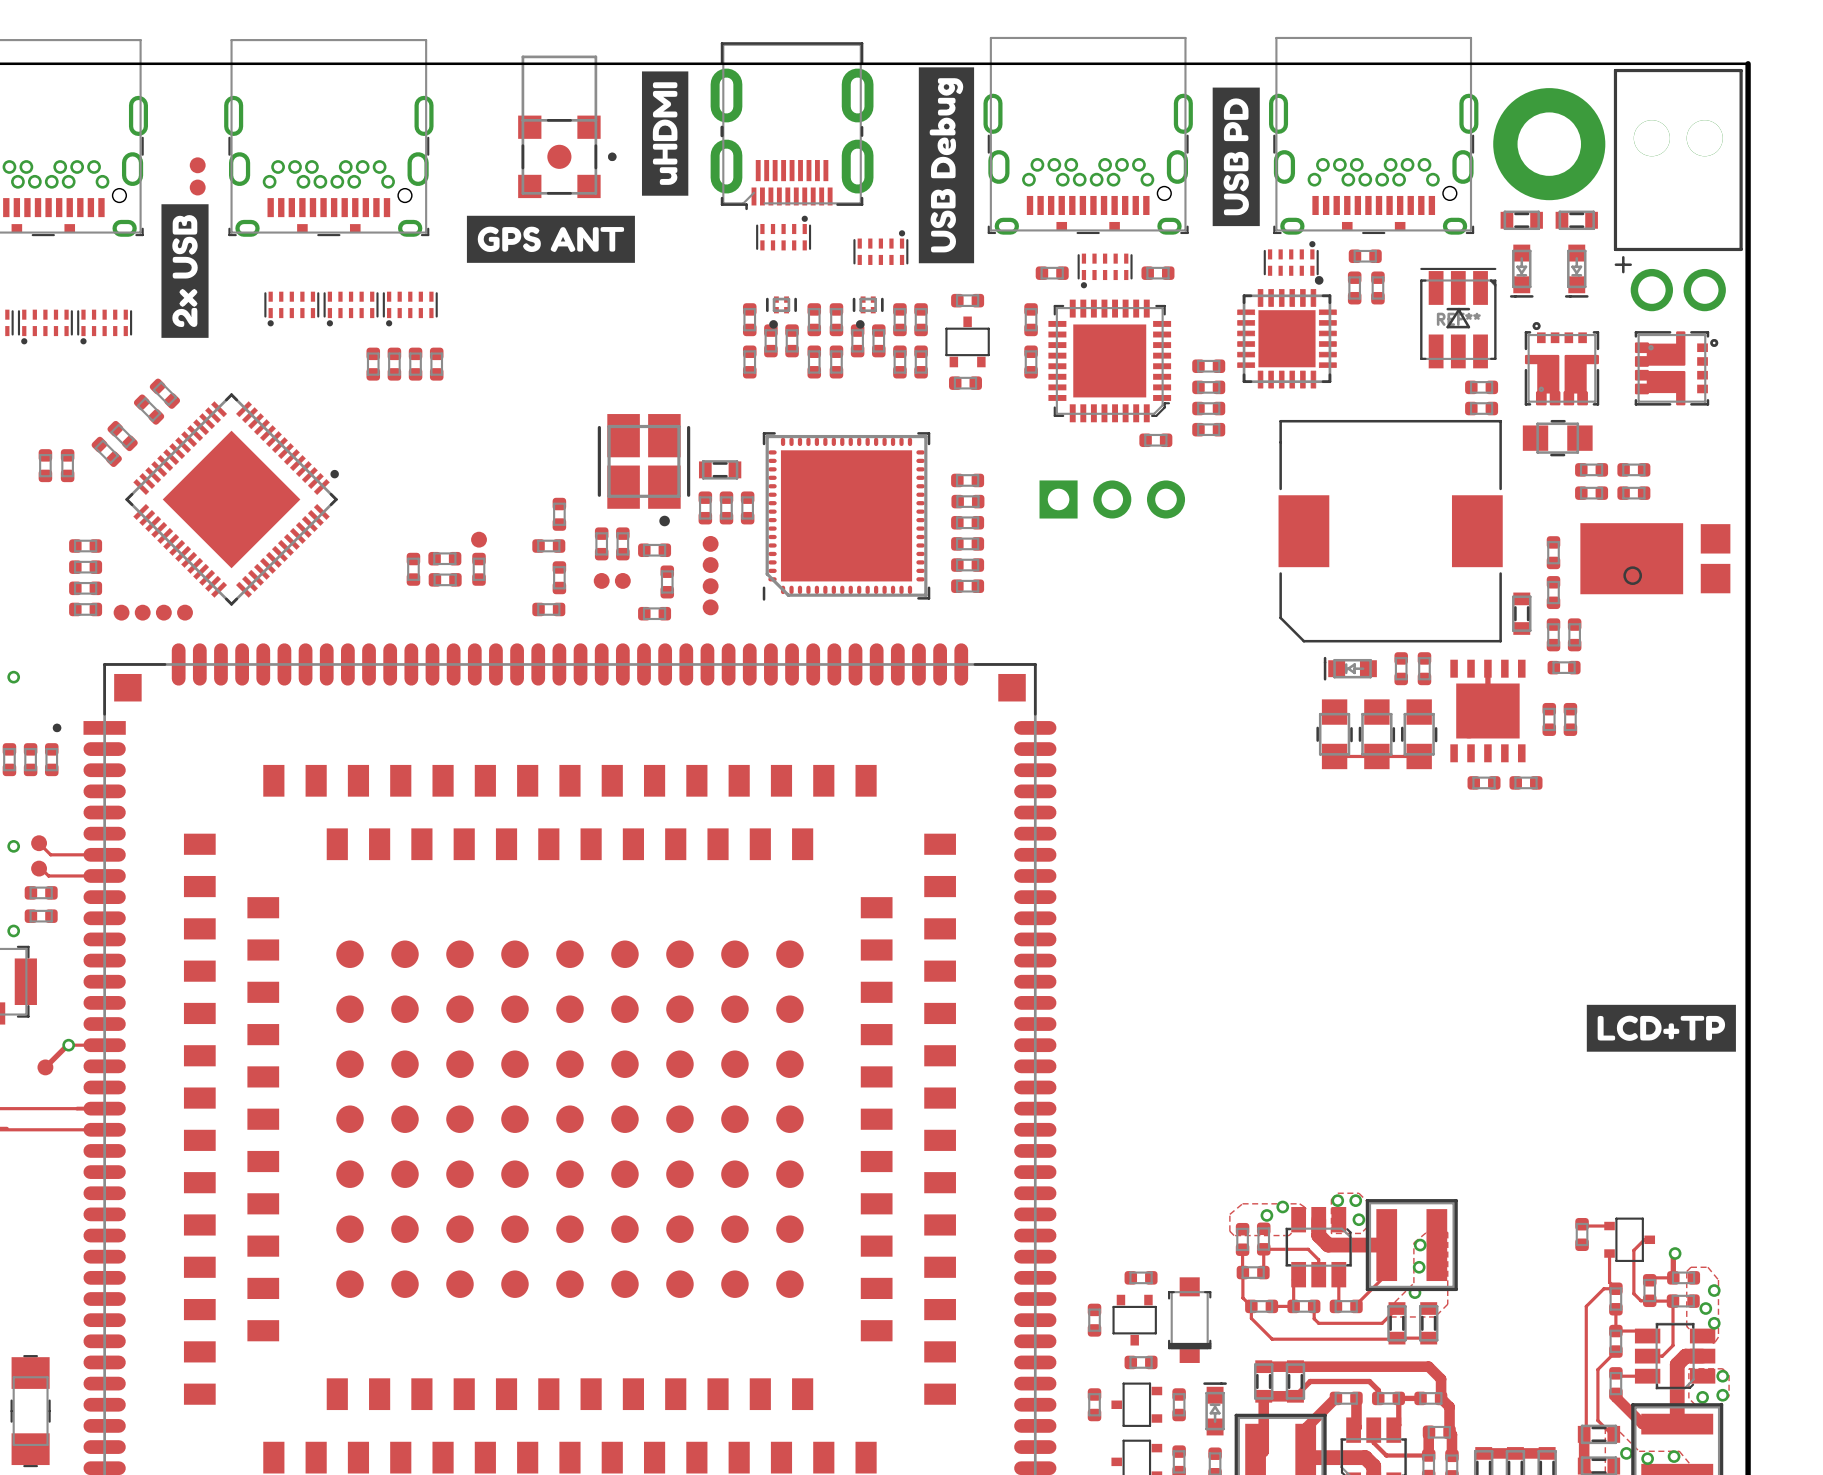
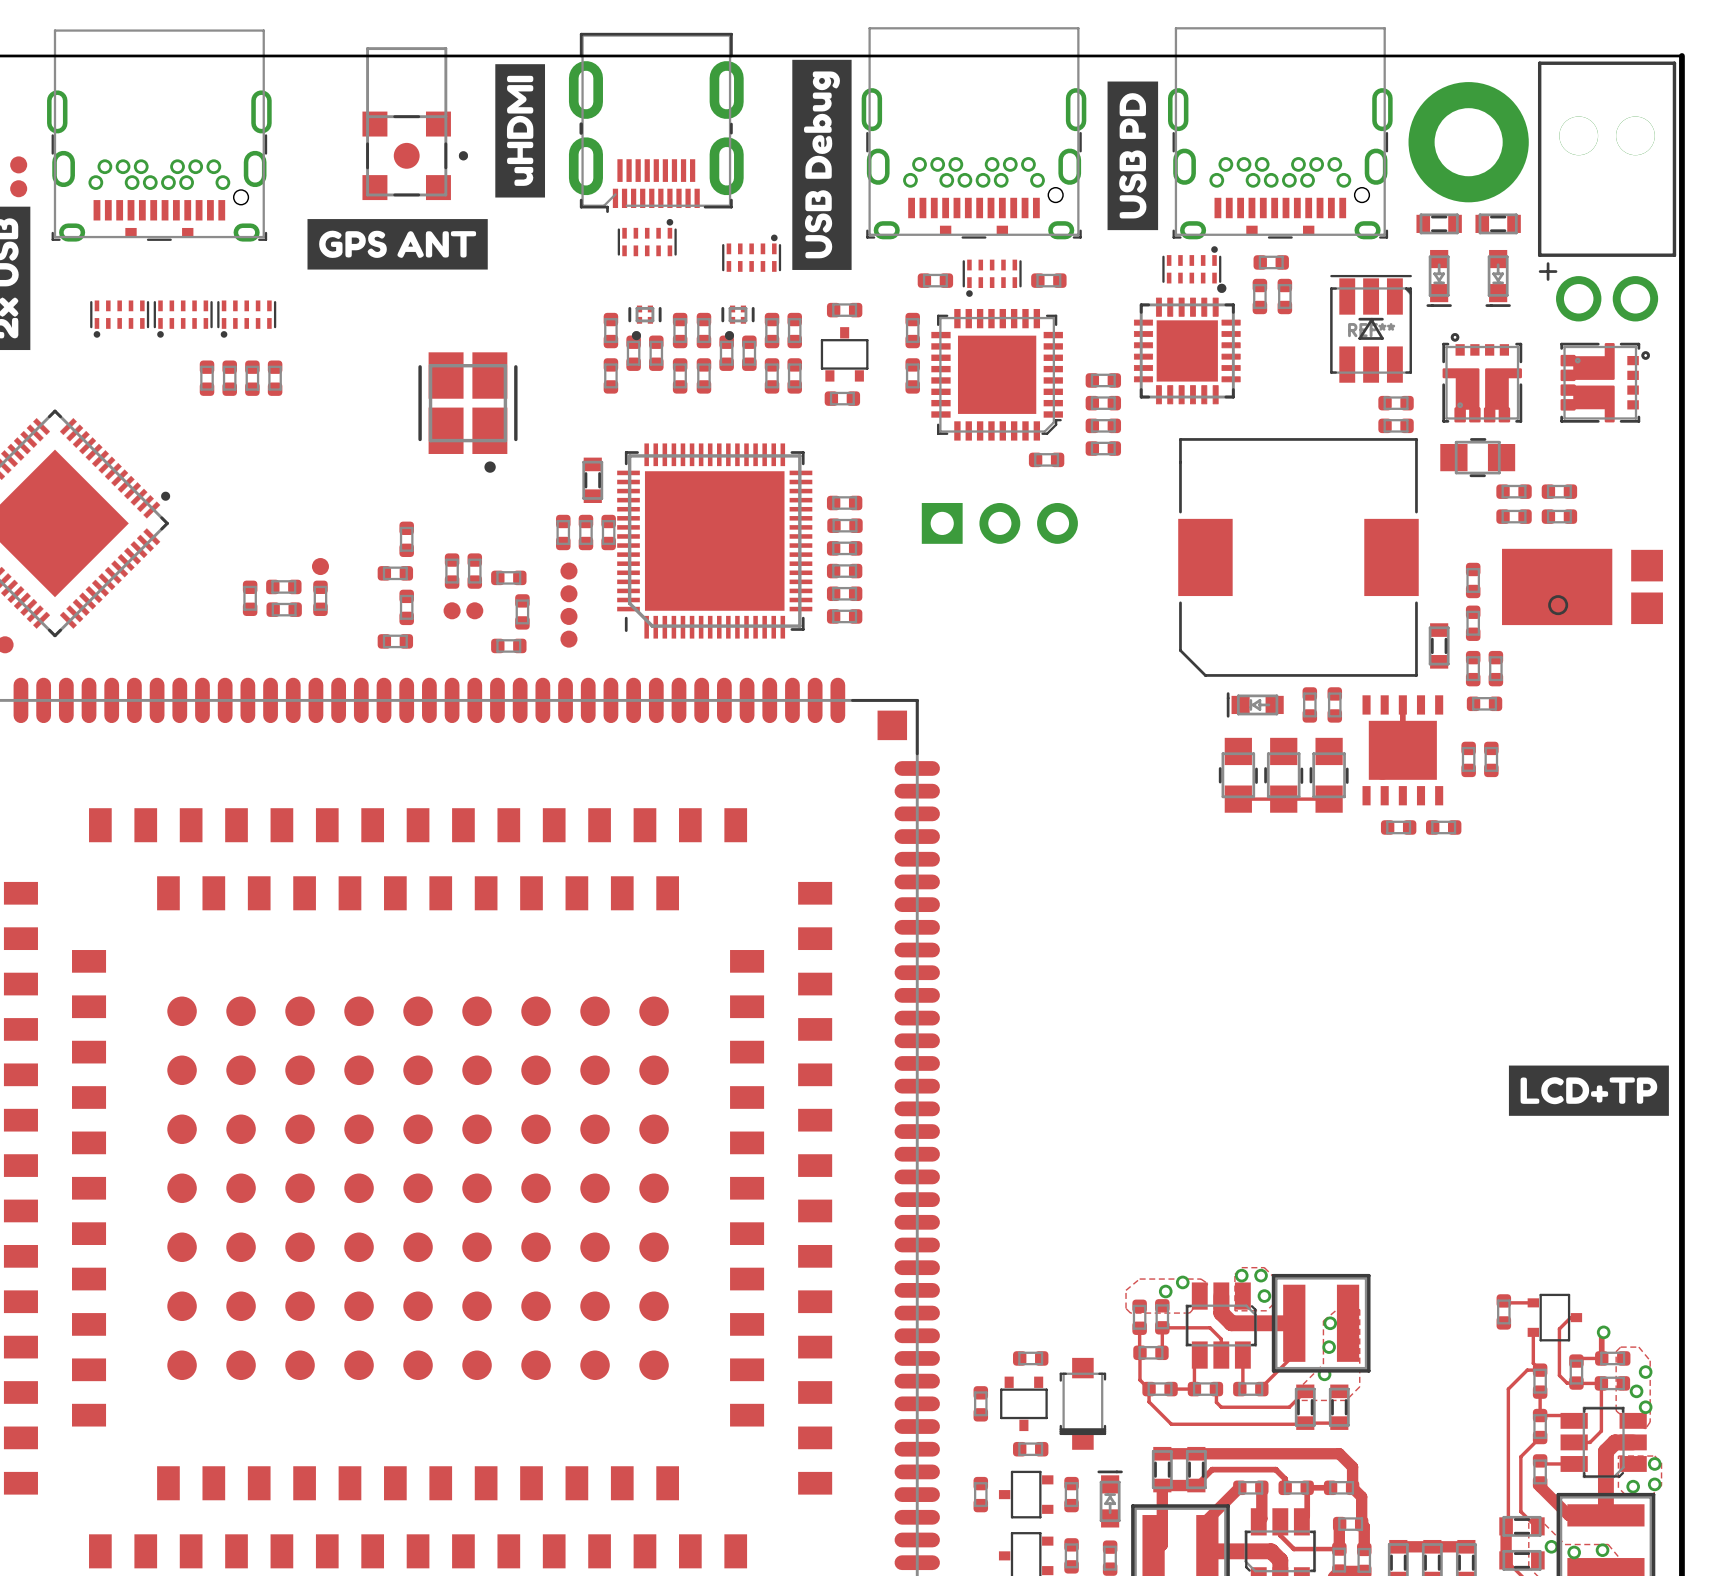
part footprint: [762, 432, 931, 601] -> [617, 443, 813, 639]
part rotation: 0° (720, 469) -> 90° clockwise (592, 480)
part position: (643, 470) -> (467, 412)

